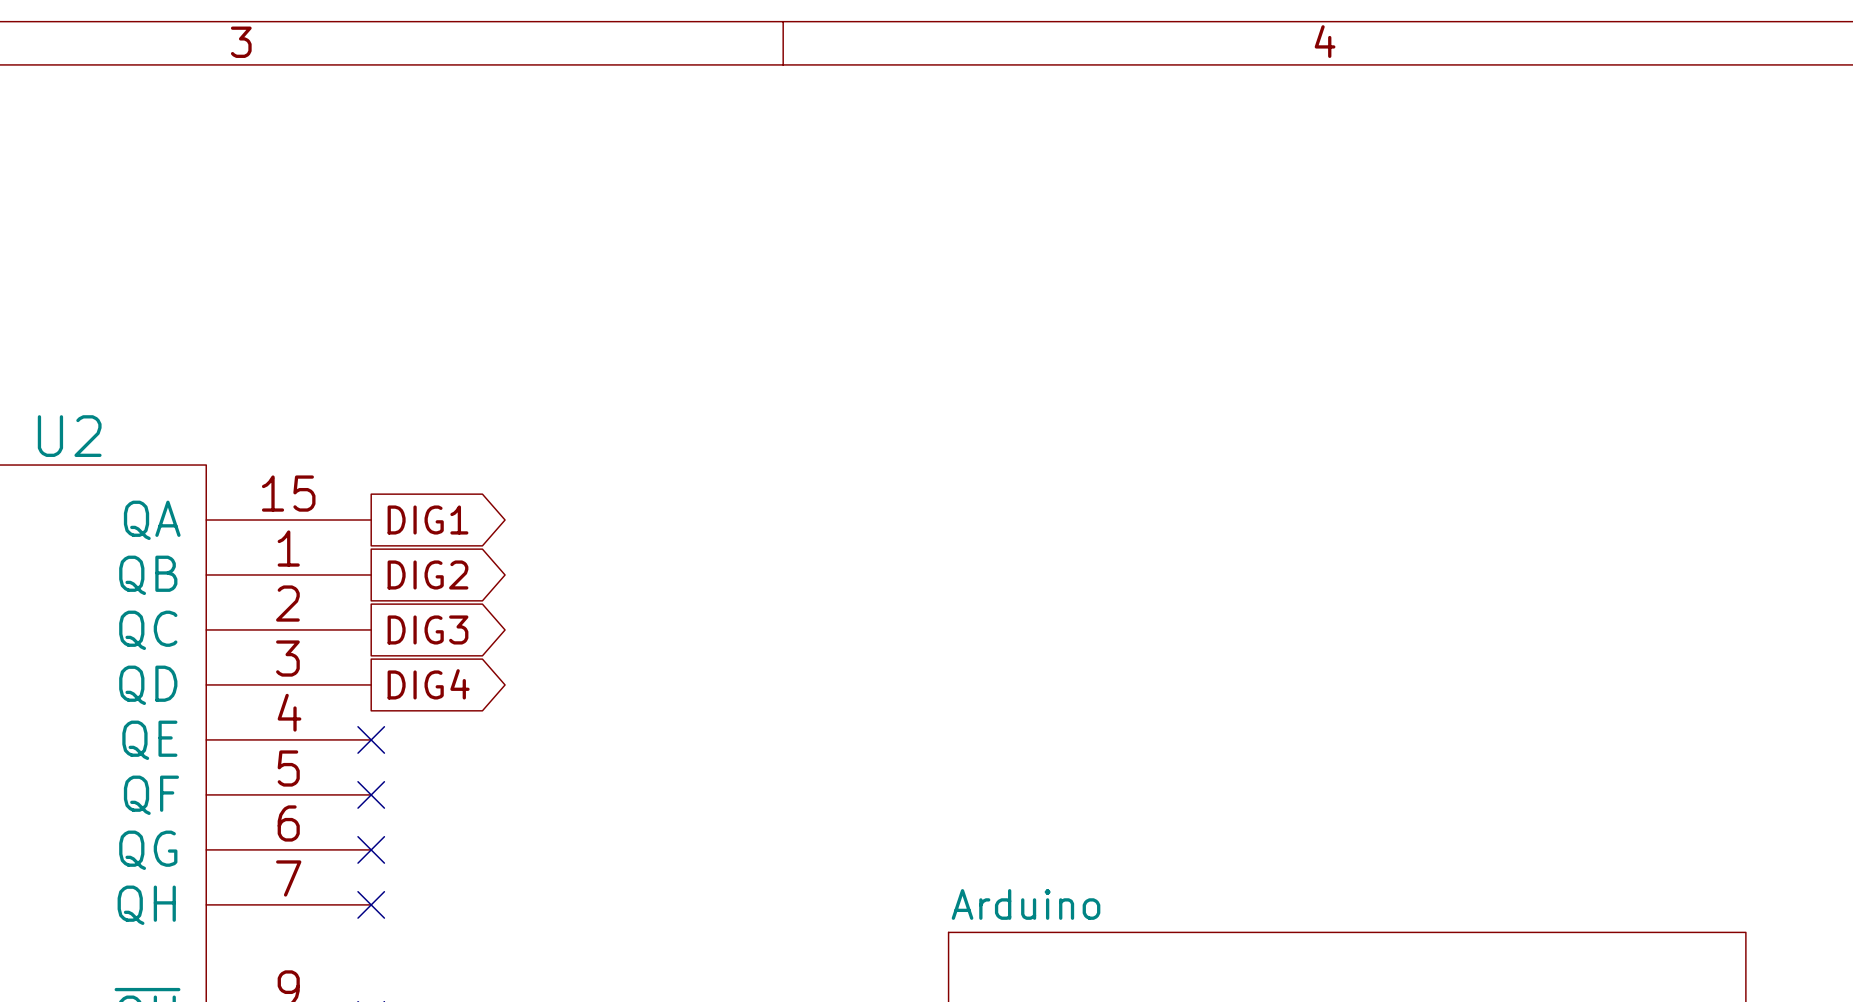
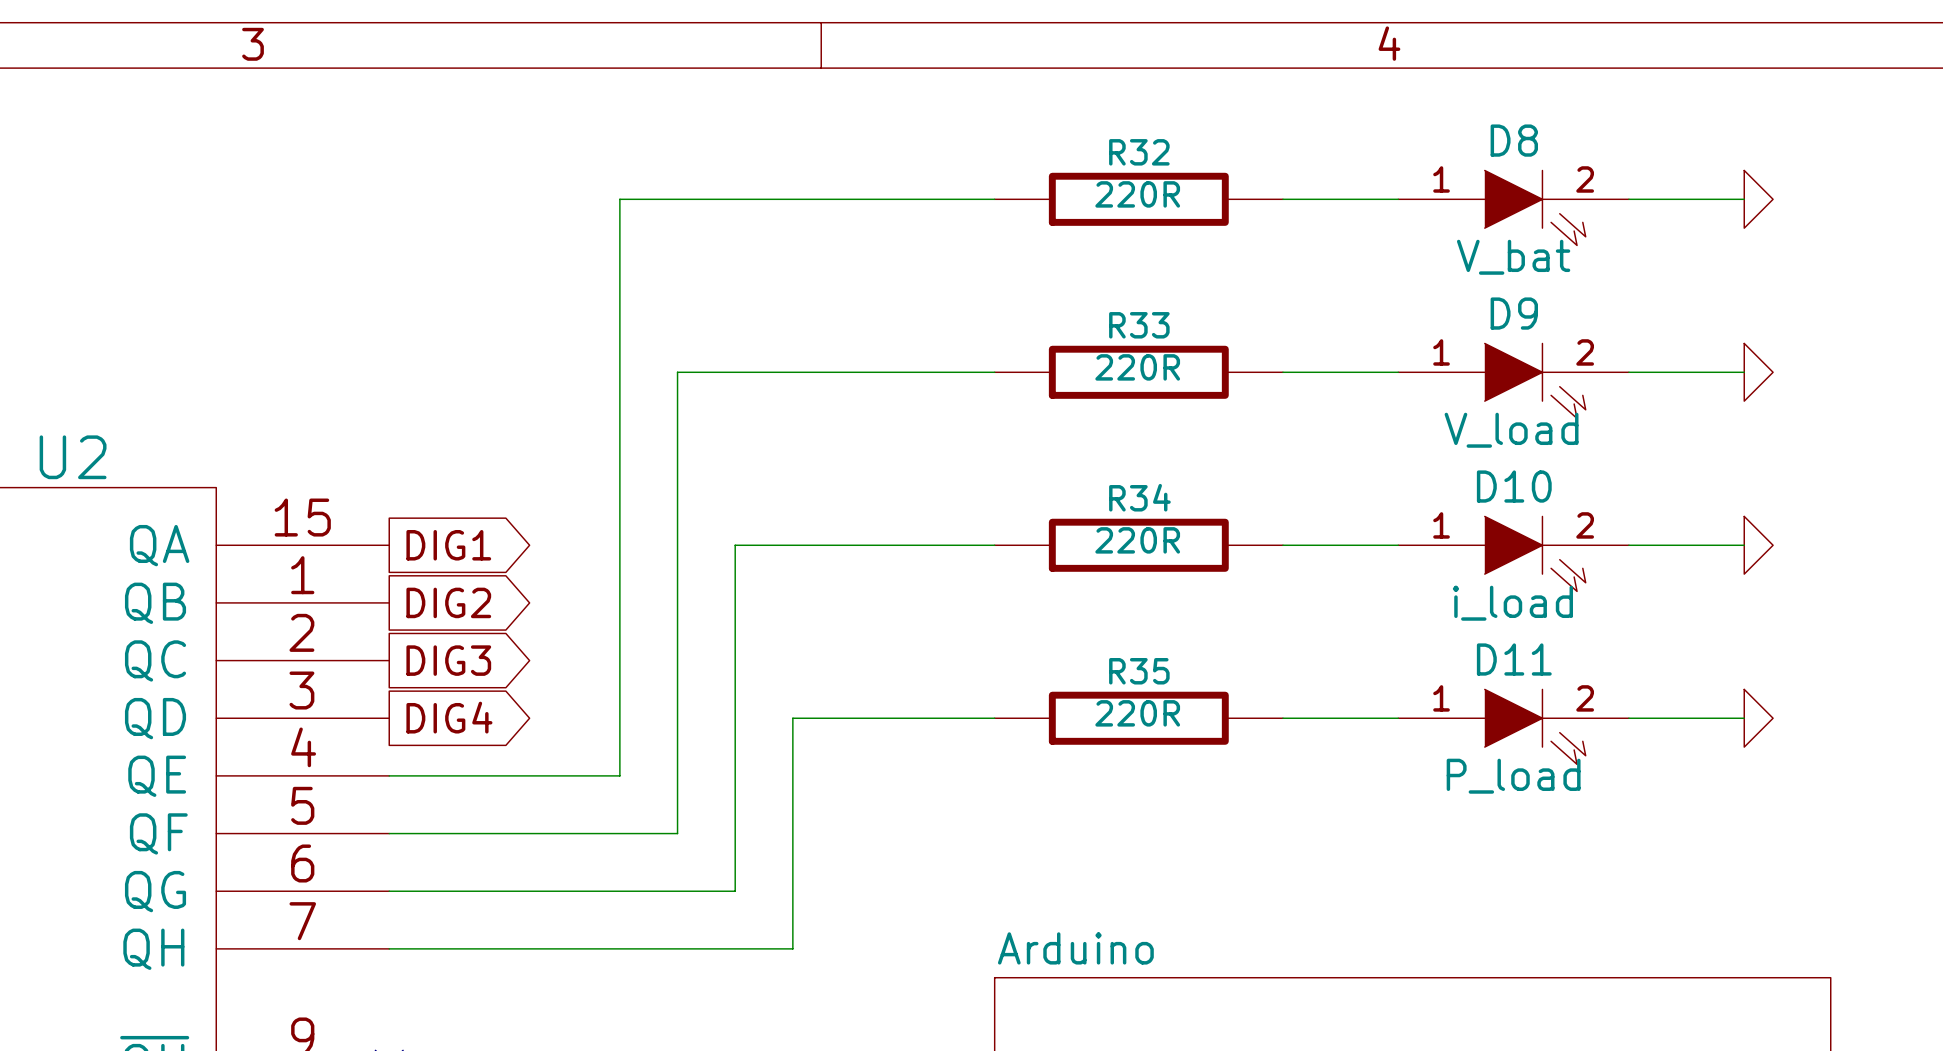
wire: none -> (994, 199) (619, 199) (619, 775) (389, 775)
R32: none -> 220R (1138, 199)
wire: none -> (1282, 199) (1398, 199)
wire: none -> (1628, 199) (1744, 199)
power symbol: none -> (1758, 199)
D8: none -> V_bat (1513, 207)
wire: none -> (994, 372) (677, 372) (677, 833) (389, 833)
R33: none -> 220R (1138, 372)
wire: none -> (1282, 372) (1398, 372)
wire: none -> (1628, 372) (1744, 372)
power symbol: none -> (1758, 372)
D9: none -> V_load (1513, 380)
wire: none -> (994, 545) (735, 545) (735, 891) (389, 891)
R34: none -> 220R (1138, 545)
wire: none -> (1282, 545) (1398, 545)
wire: none -> (1628, 545) (1744, 545)
power symbol: none -> (1758, 545)
D10: none -> i_load (1513, 553)
wire: none -> (994, 718) (792, 718) (792, 948) (389, 948)
R35: none -> 220R (1138, 718)
wire: none -> (1282, 718) (1398, 718)
wire: none -> (1628, 718) (1744, 718)
power symbol: none -> (1758, 718)
D11: none -> P_load (1513, 726)
no-connect mark: (371, 739) -> none
no-connect mark: (371, 794) -> none
no-connect mark: (371, 849) -> none
no-connect mark: (371, 904) -> none

